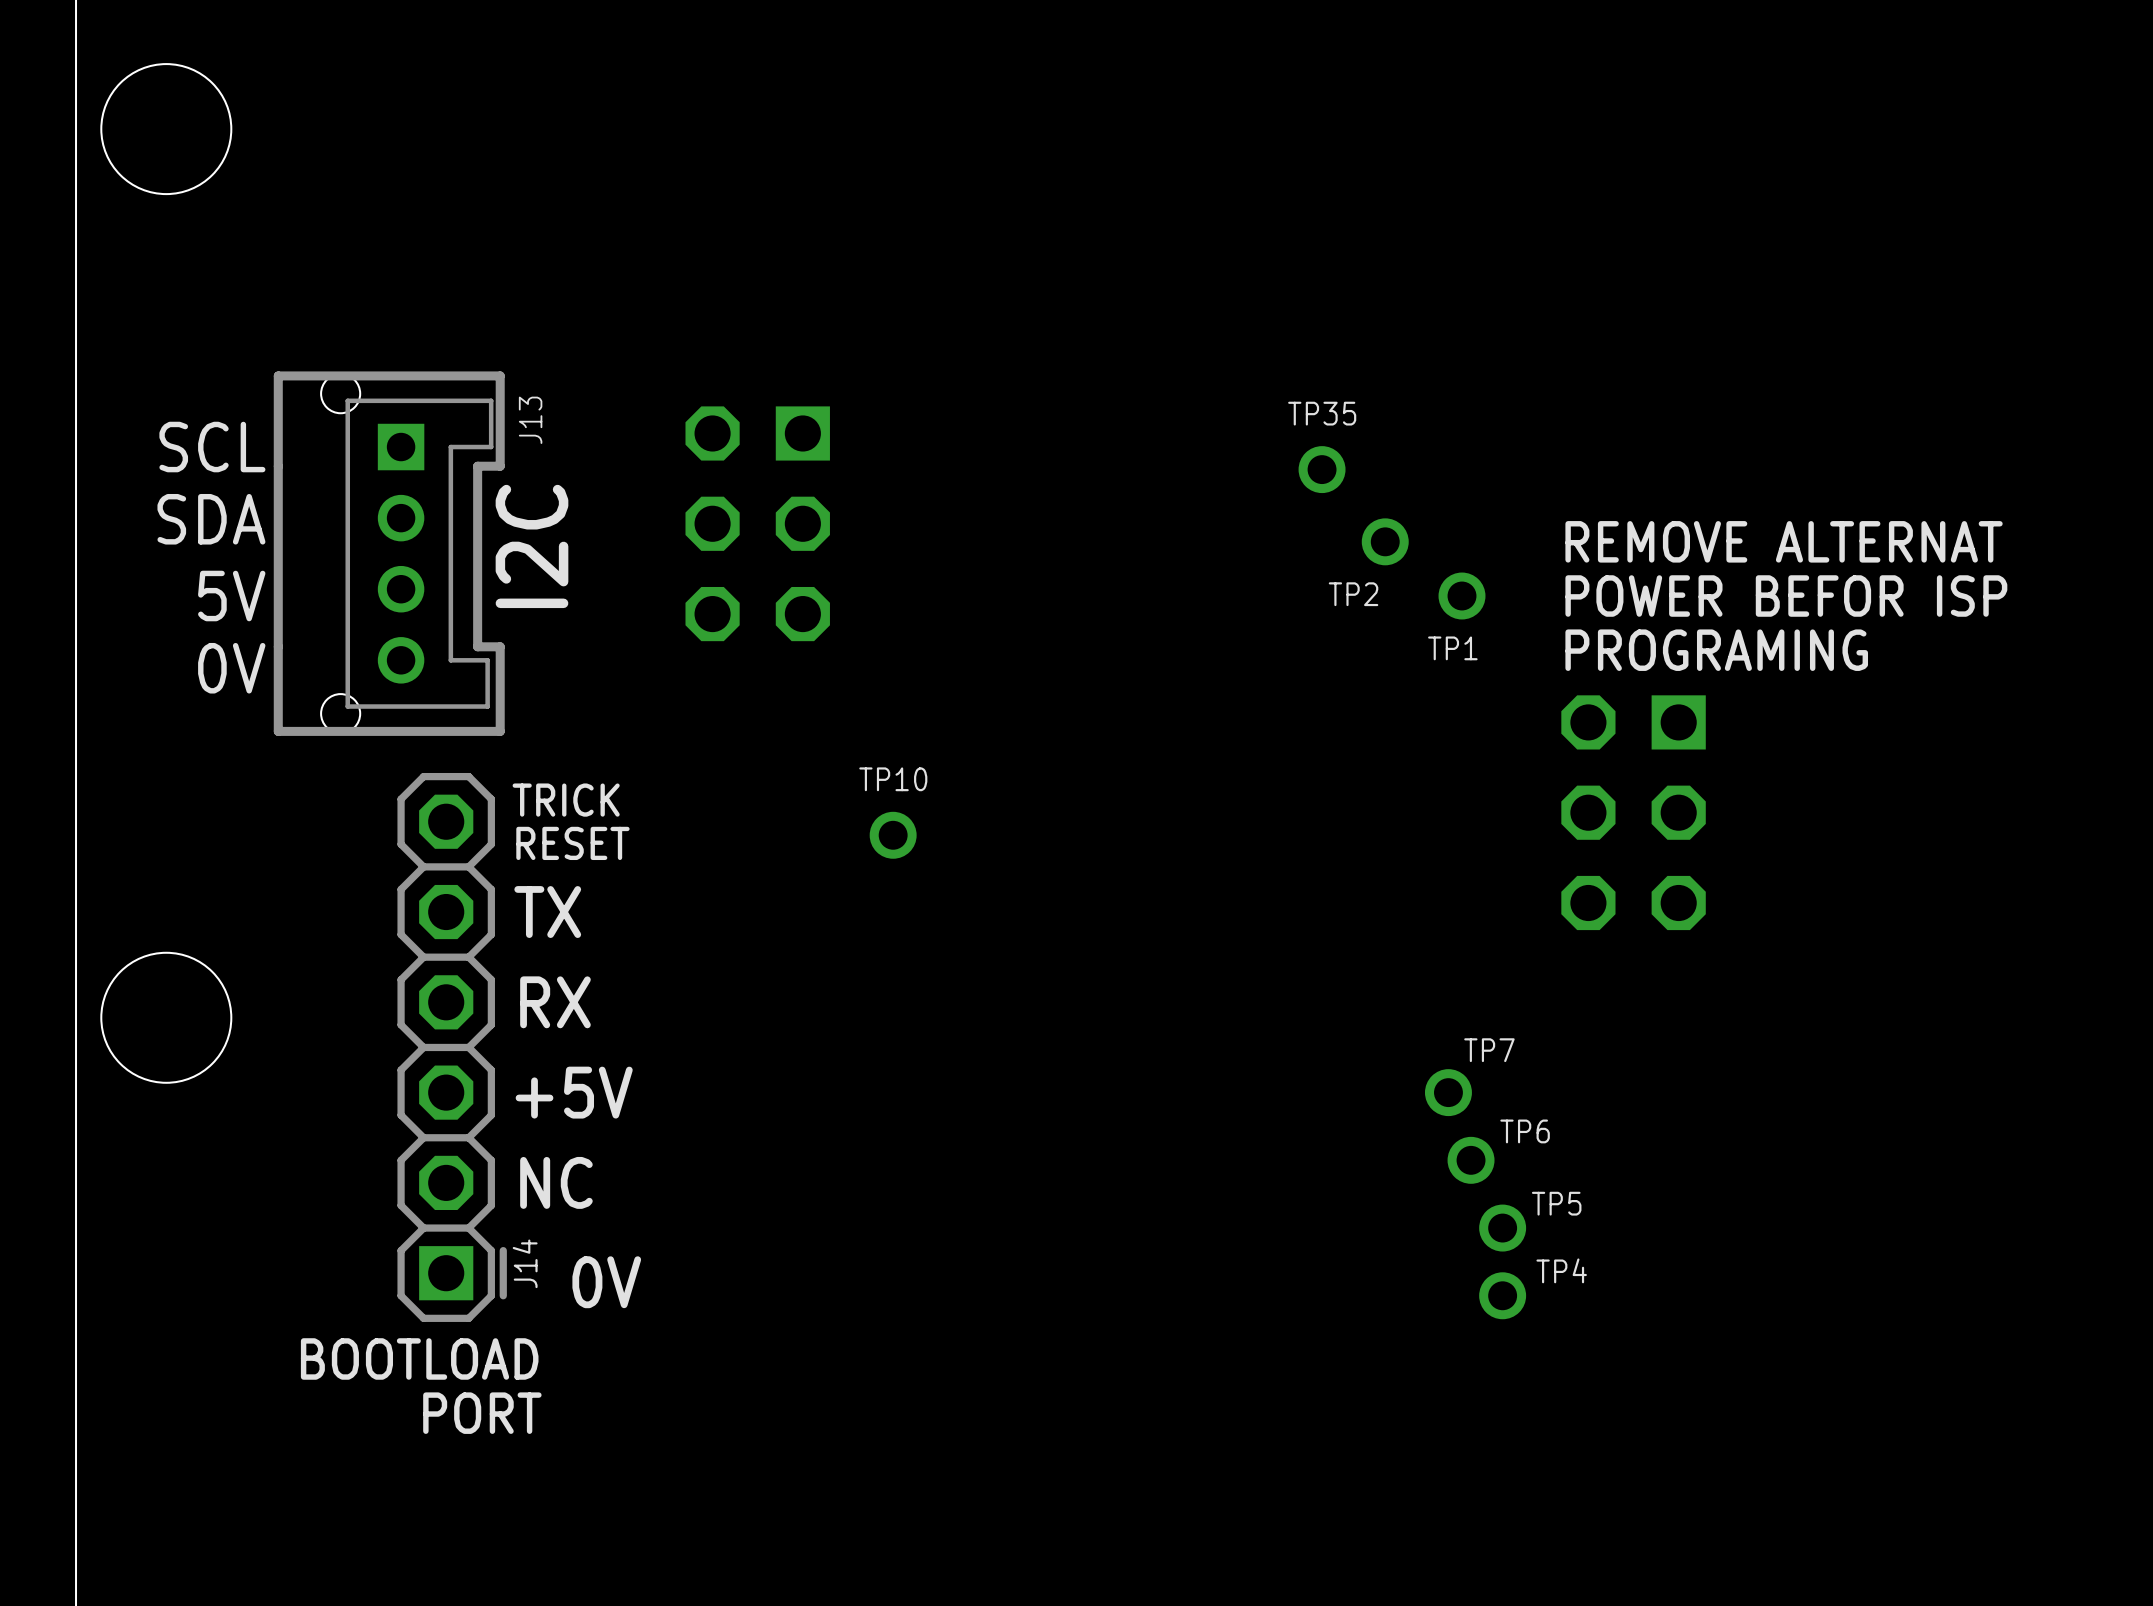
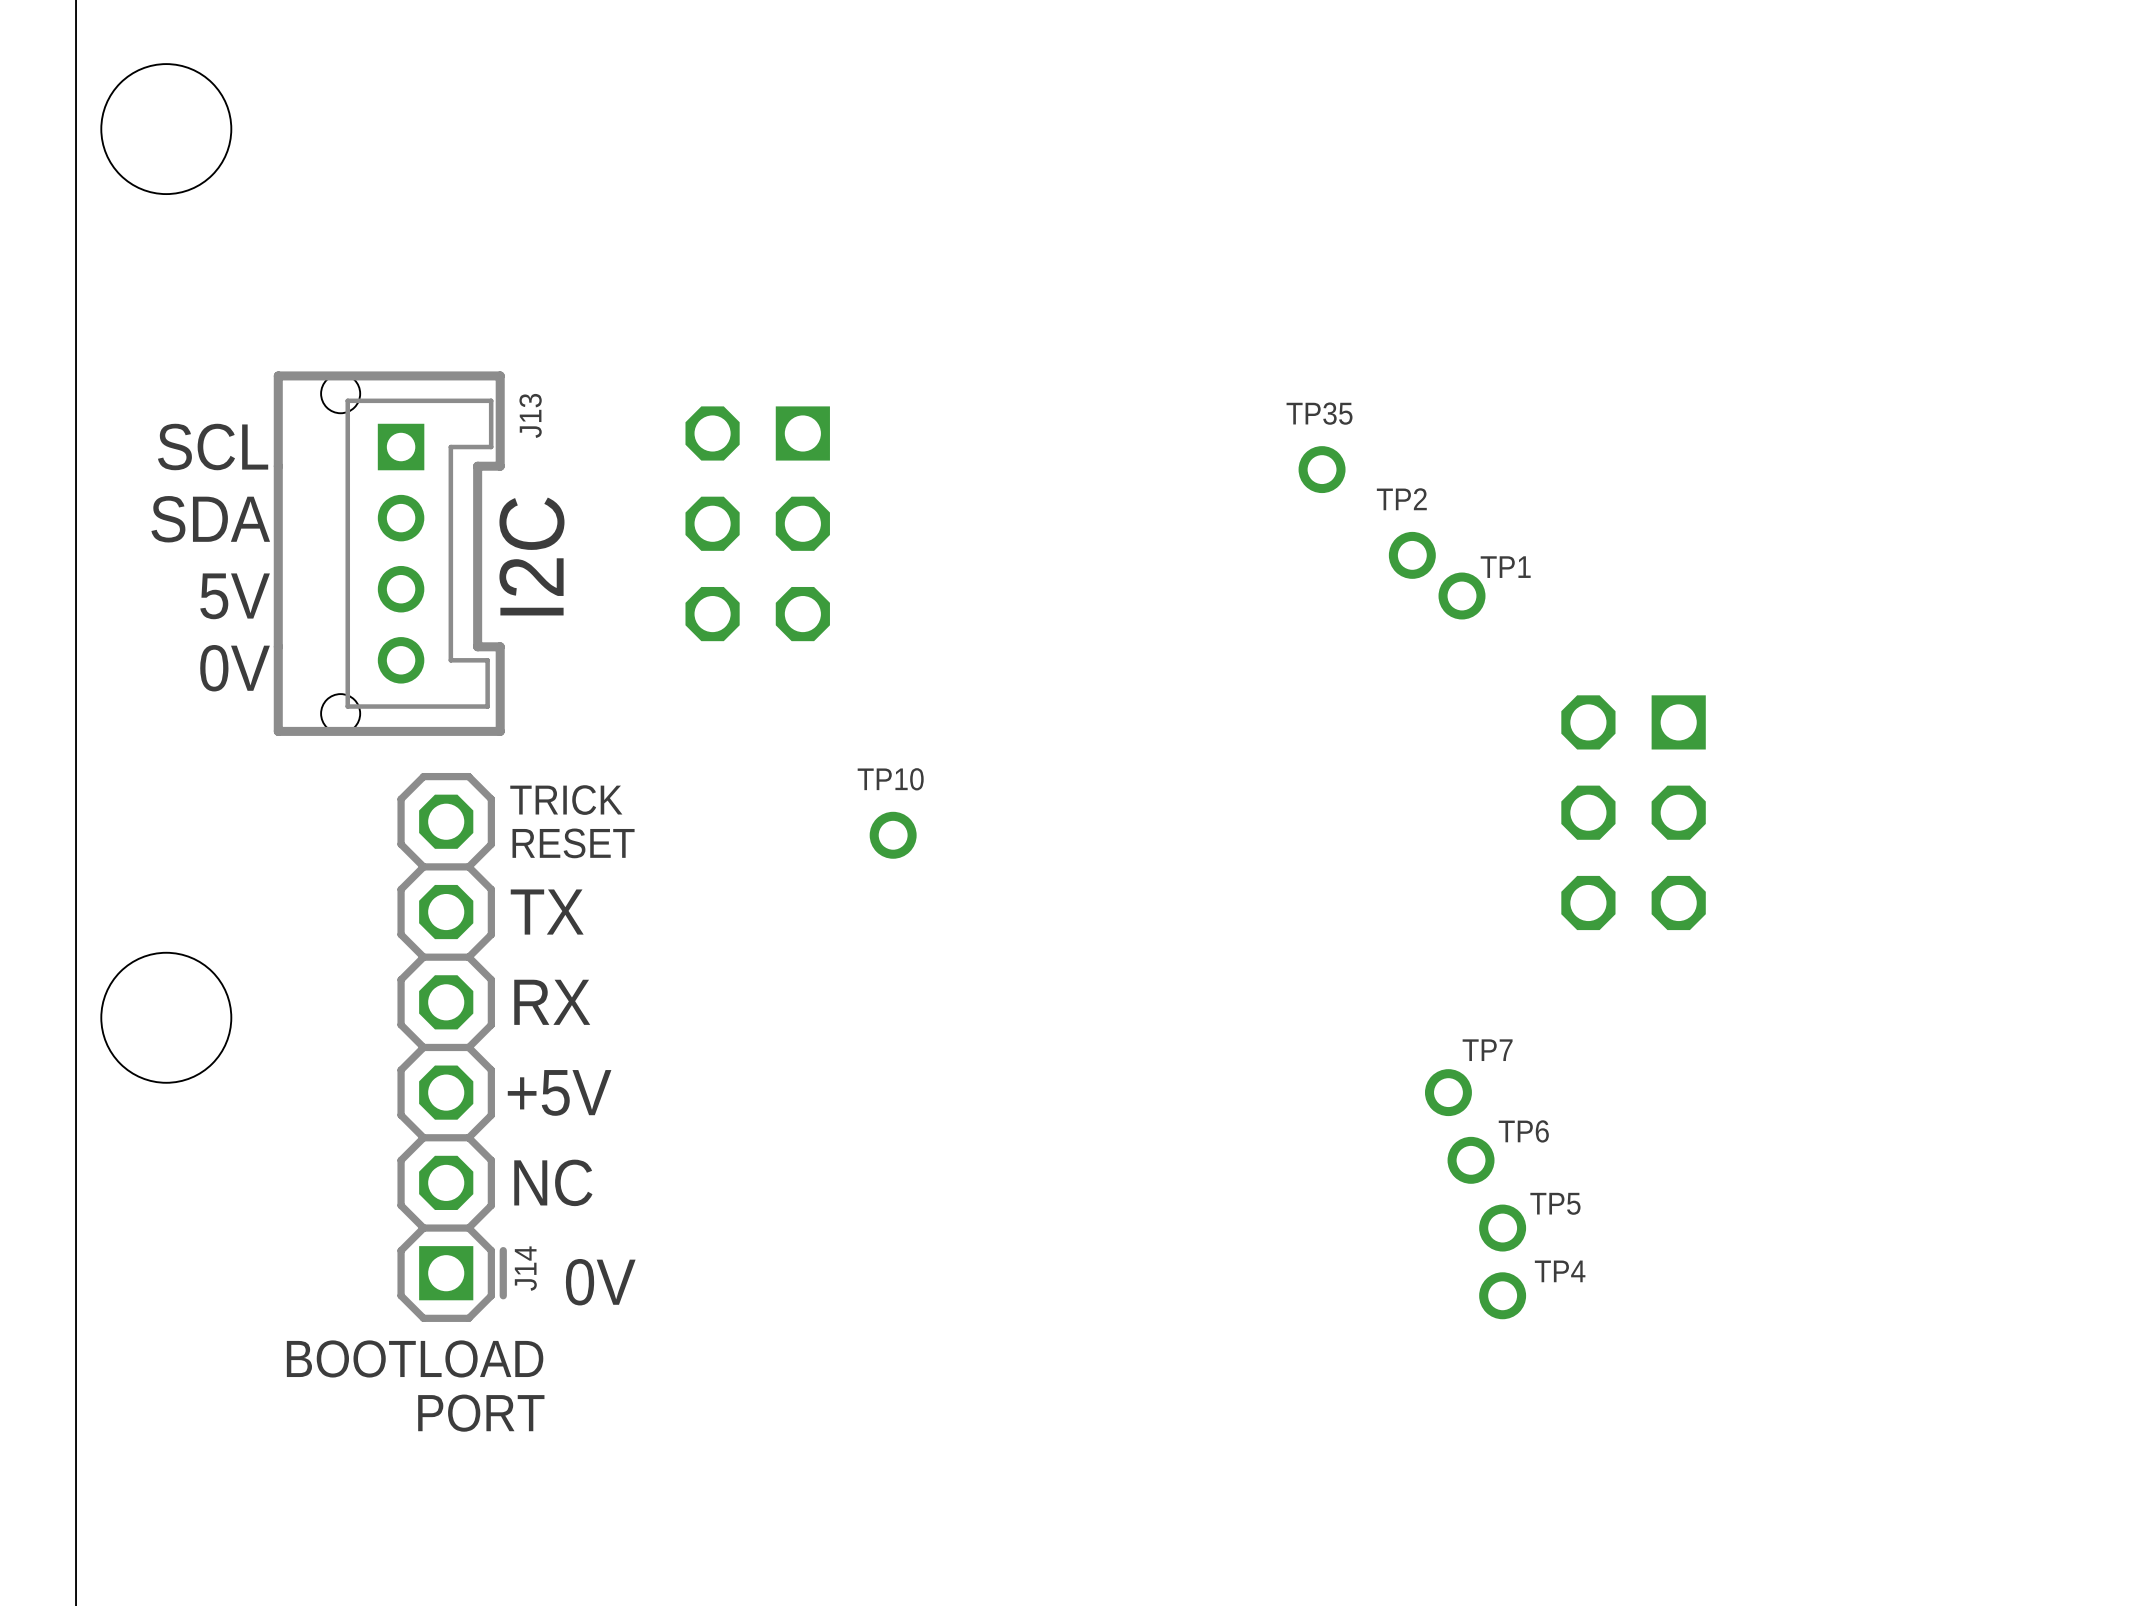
TP2 position: (1385, 541) -> (1412, 555)
text: REMOVE ALTERNAT (1784, 541) -> none
TP2 name position: TP2 (1353, 594) -> TP2 (1401, 499)
text: POWER BEFOR ISP (1786, 596) -> none
TP1 name position: TP1 (1452, 648) -> TP1 (1505, 567)
text: PROGRAMING (1716, 650) -> none

